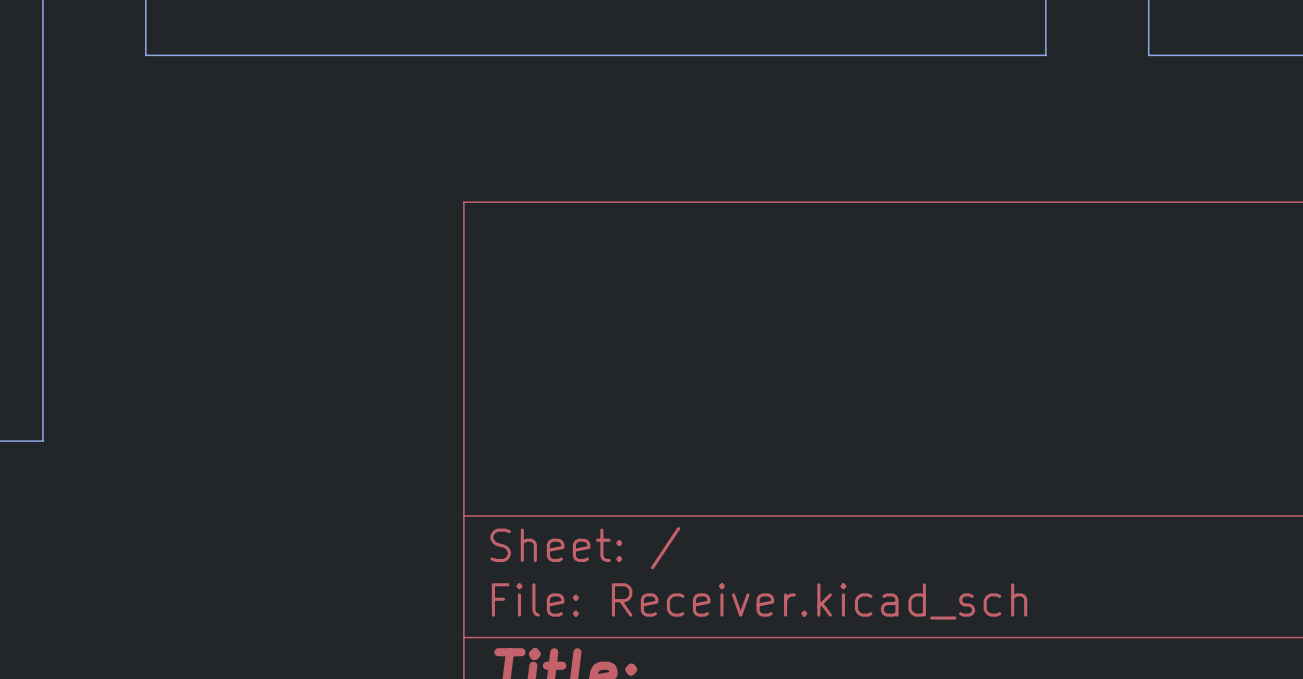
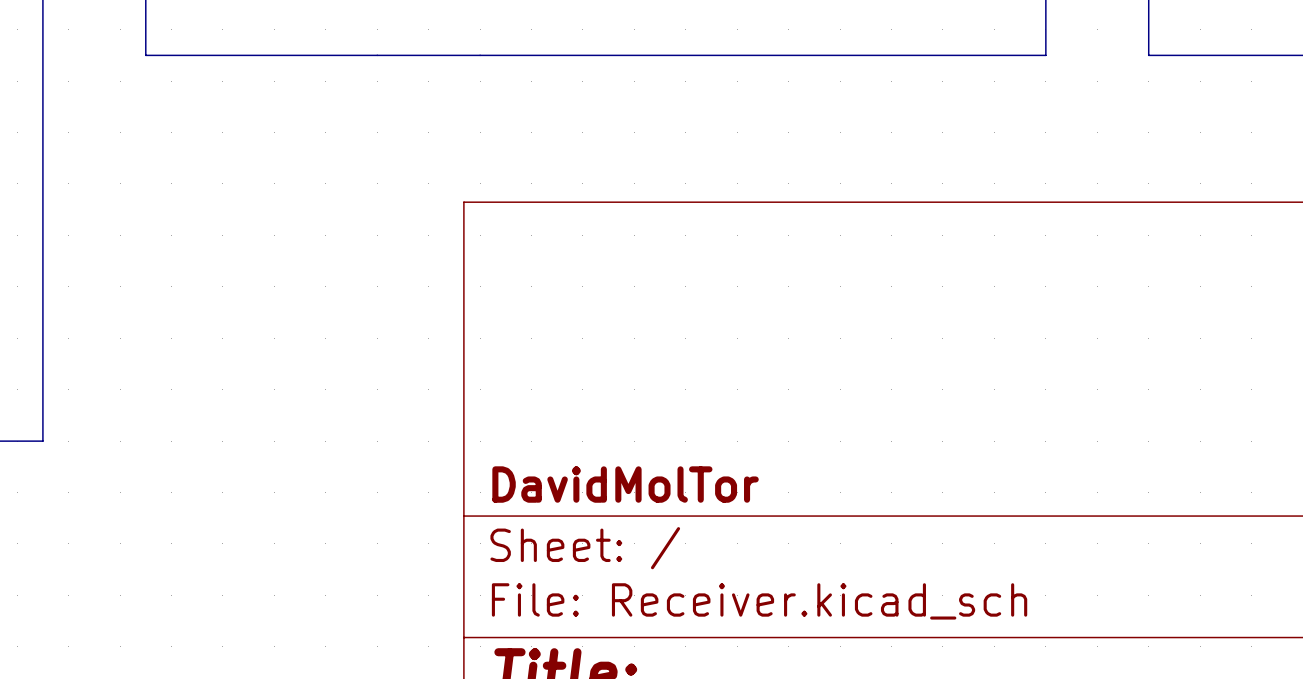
title block: none -> DavidMolTor (625, 484)

